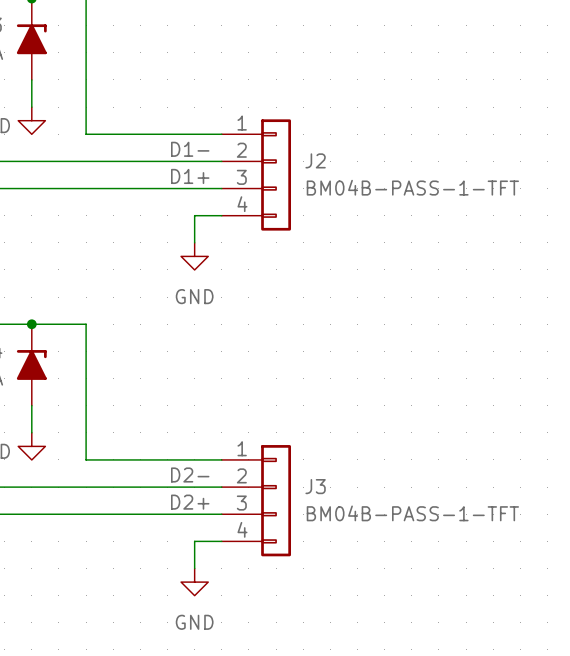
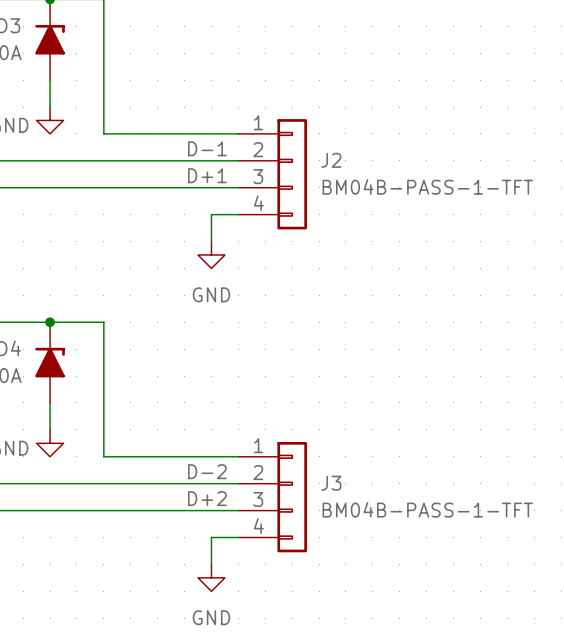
label: D1- (190, 149) -> D-1 (207, 148)
label: D1+ (190, 176) -> D+1 (207, 175)
label: D2- (190, 474) -> D-2 (207, 471)
label: D2+ (190, 502) -> D+2 (207, 498)

